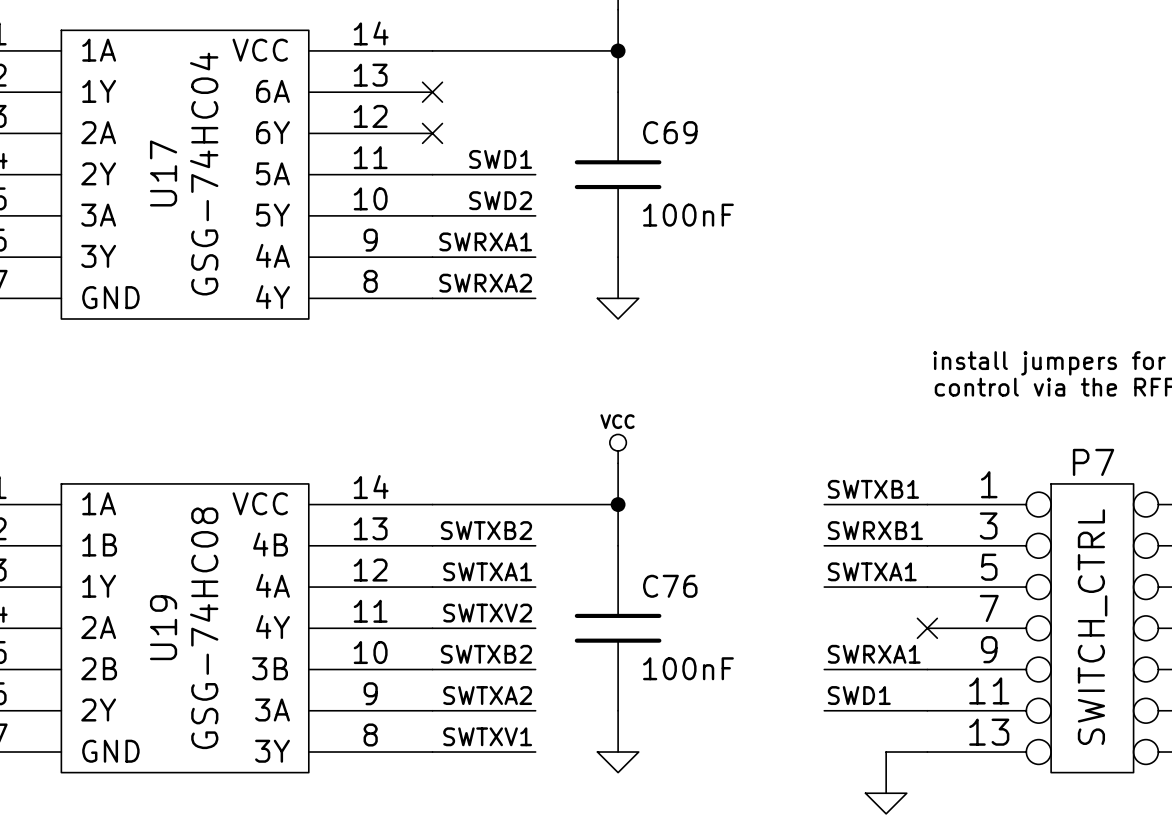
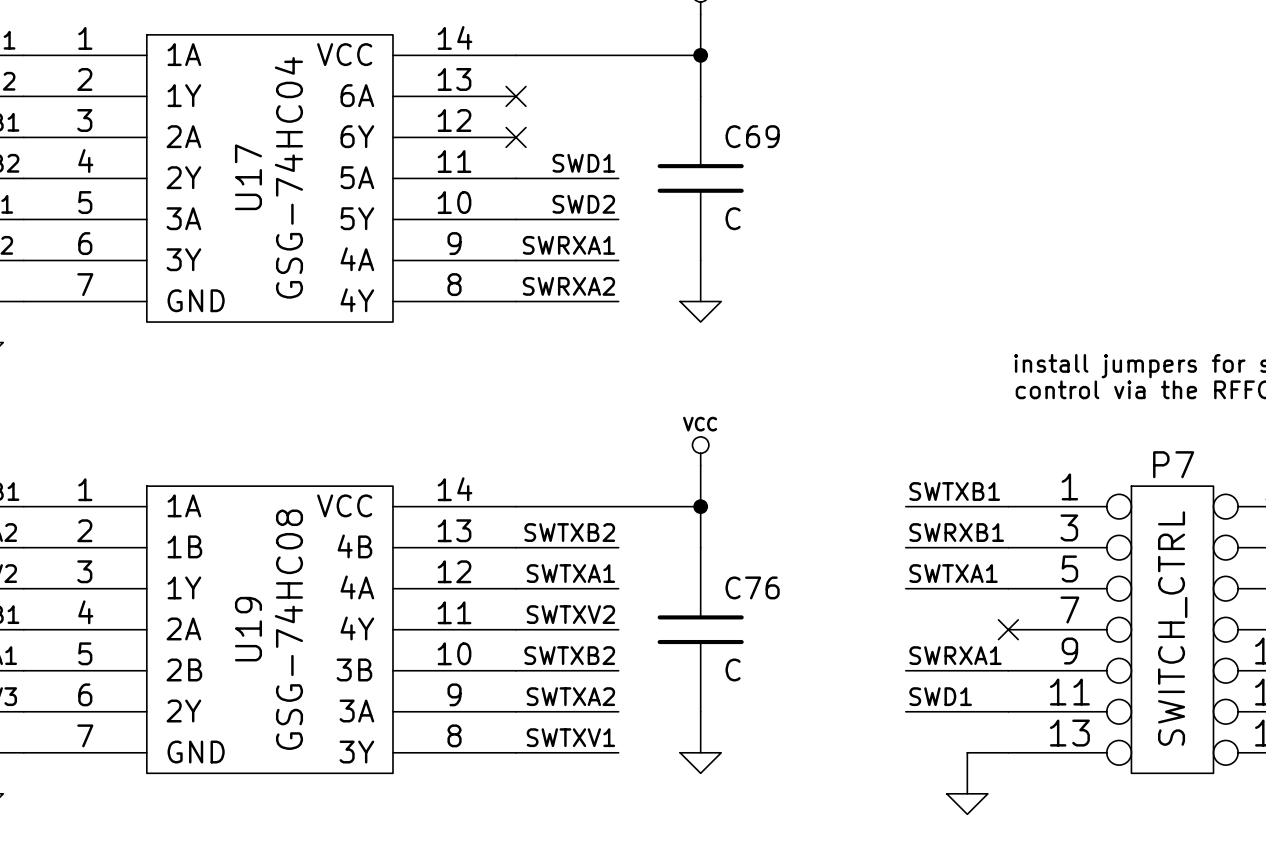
C69 value: 100nF (688, 215) -> C (733, 218)
C76 value: 100nF (688, 668) -> C (733, 669)

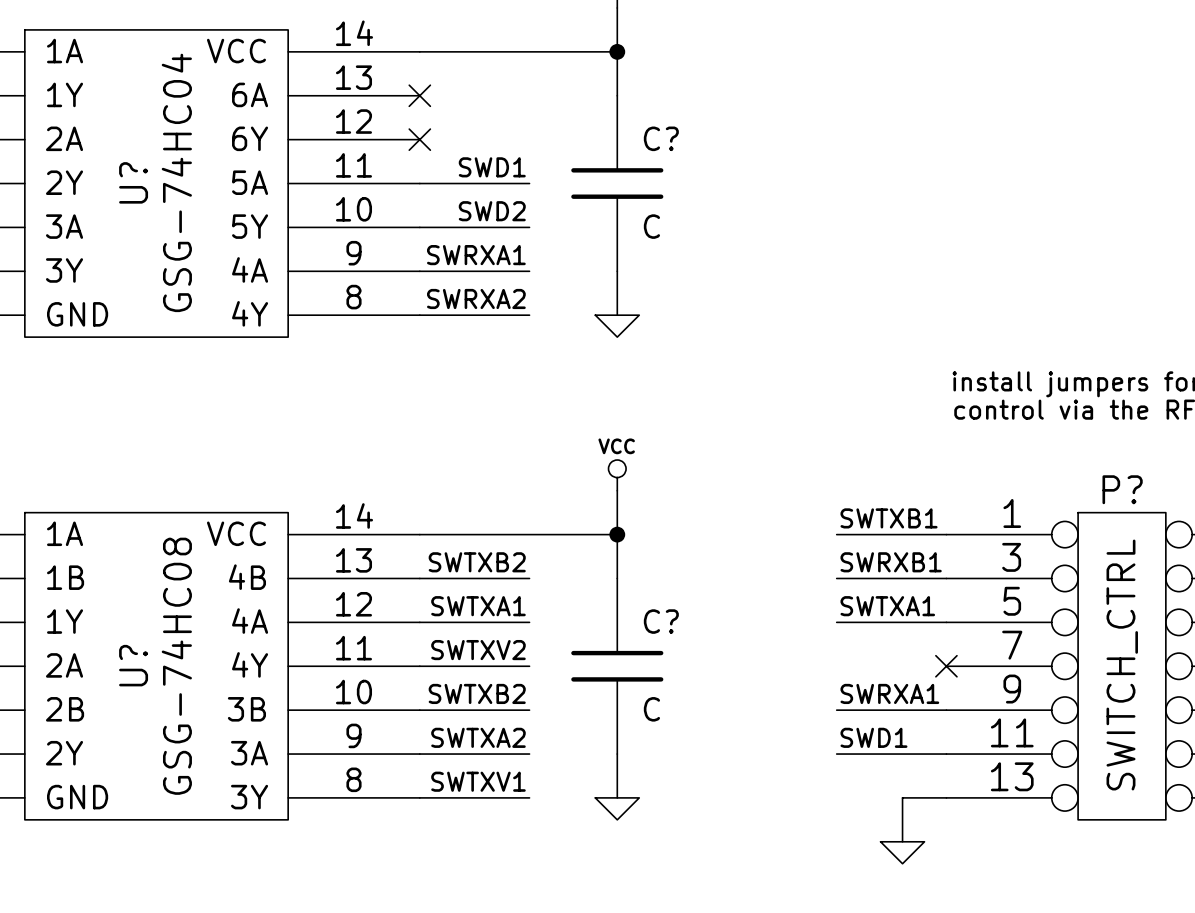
C69 name: C69 (752, 136) -> C? (661, 138)
U17 name: U17 (248, 177) -> U? (133, 182)
P7 name: P7 (1173, 464) -> P? (1122, 489)
C76 name: C76 (752, 587) -> C? (661, 621)
U19 name: U19 (248, 629) -> U? (133, 665)

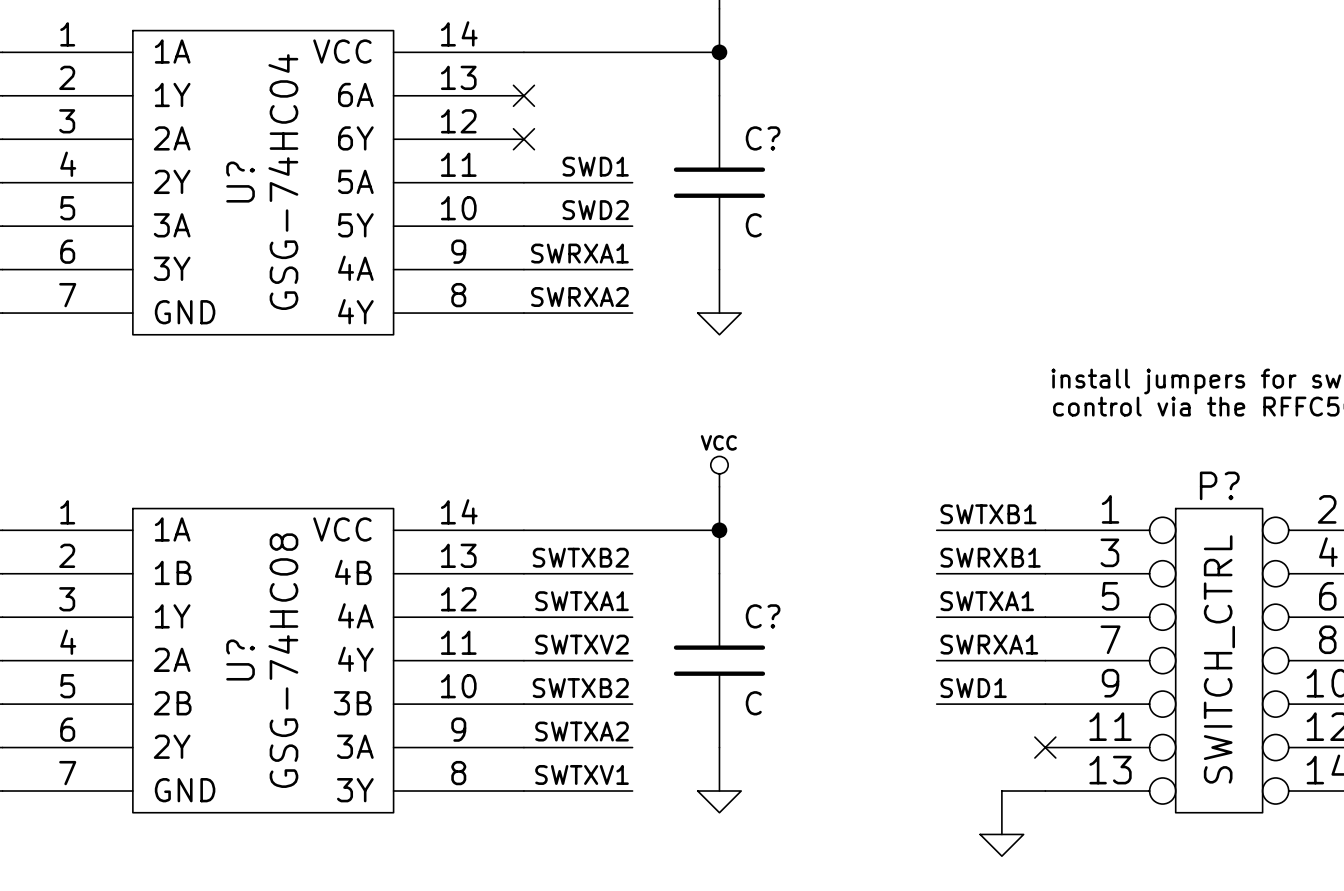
label: none -> SWRXA1 (989, 644)
no-connect mark position: (946, 666) -> (1045, 747)
label: SWRXA1 (889, 693) -> SWD1 (973, 688)
label: SWD1 (873, 737) -> none
wire: (836, 754) (946, 754) -> (936, 660) (1045, 660)

